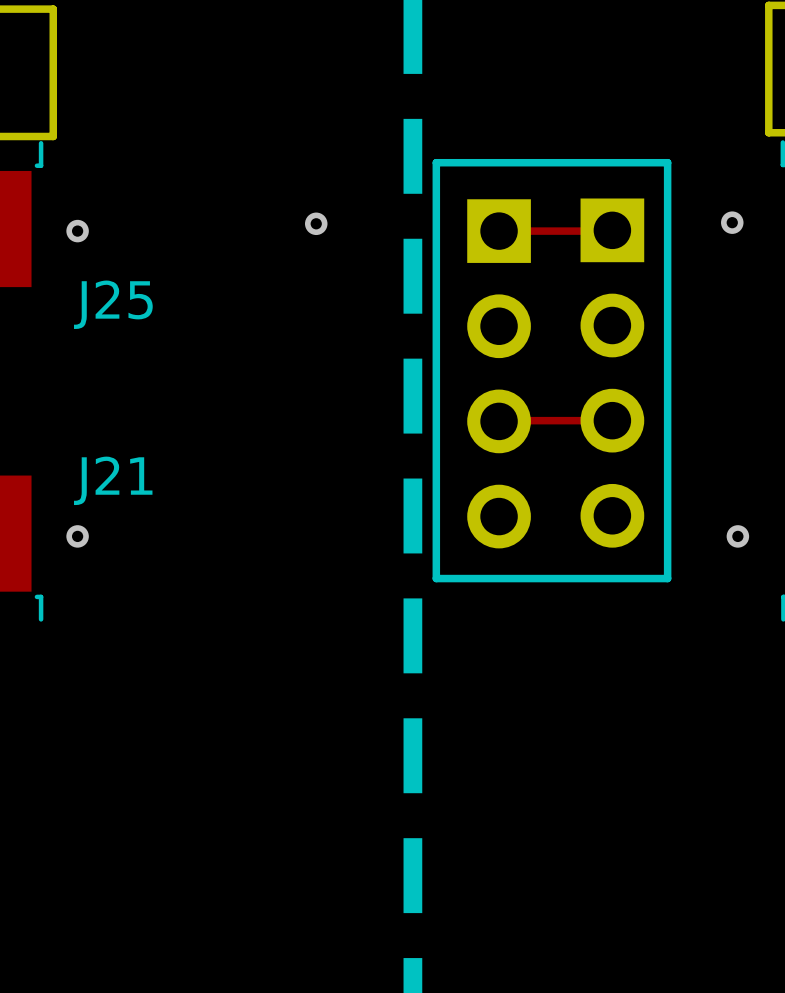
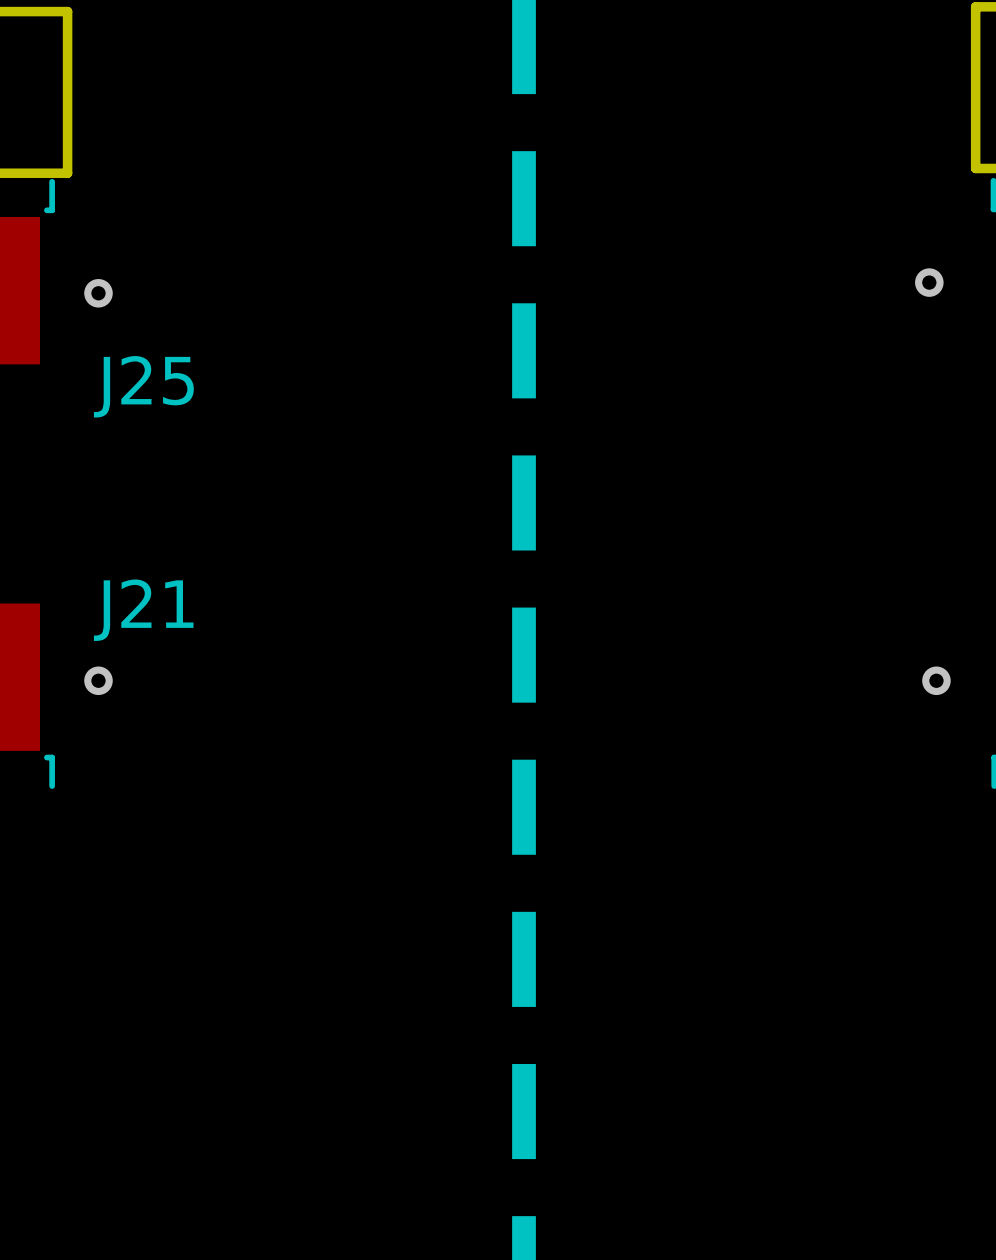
line: (436, 162) (667, 162) (667, 578) (436, 578) (436, 162) -> none
via: (316, 223) -> none
track: (499, 231) (611, 231) -> none
part: (499, 373) -> none
part: (612, 373) -> none
track: (499, 420) (612, 420) -> none

